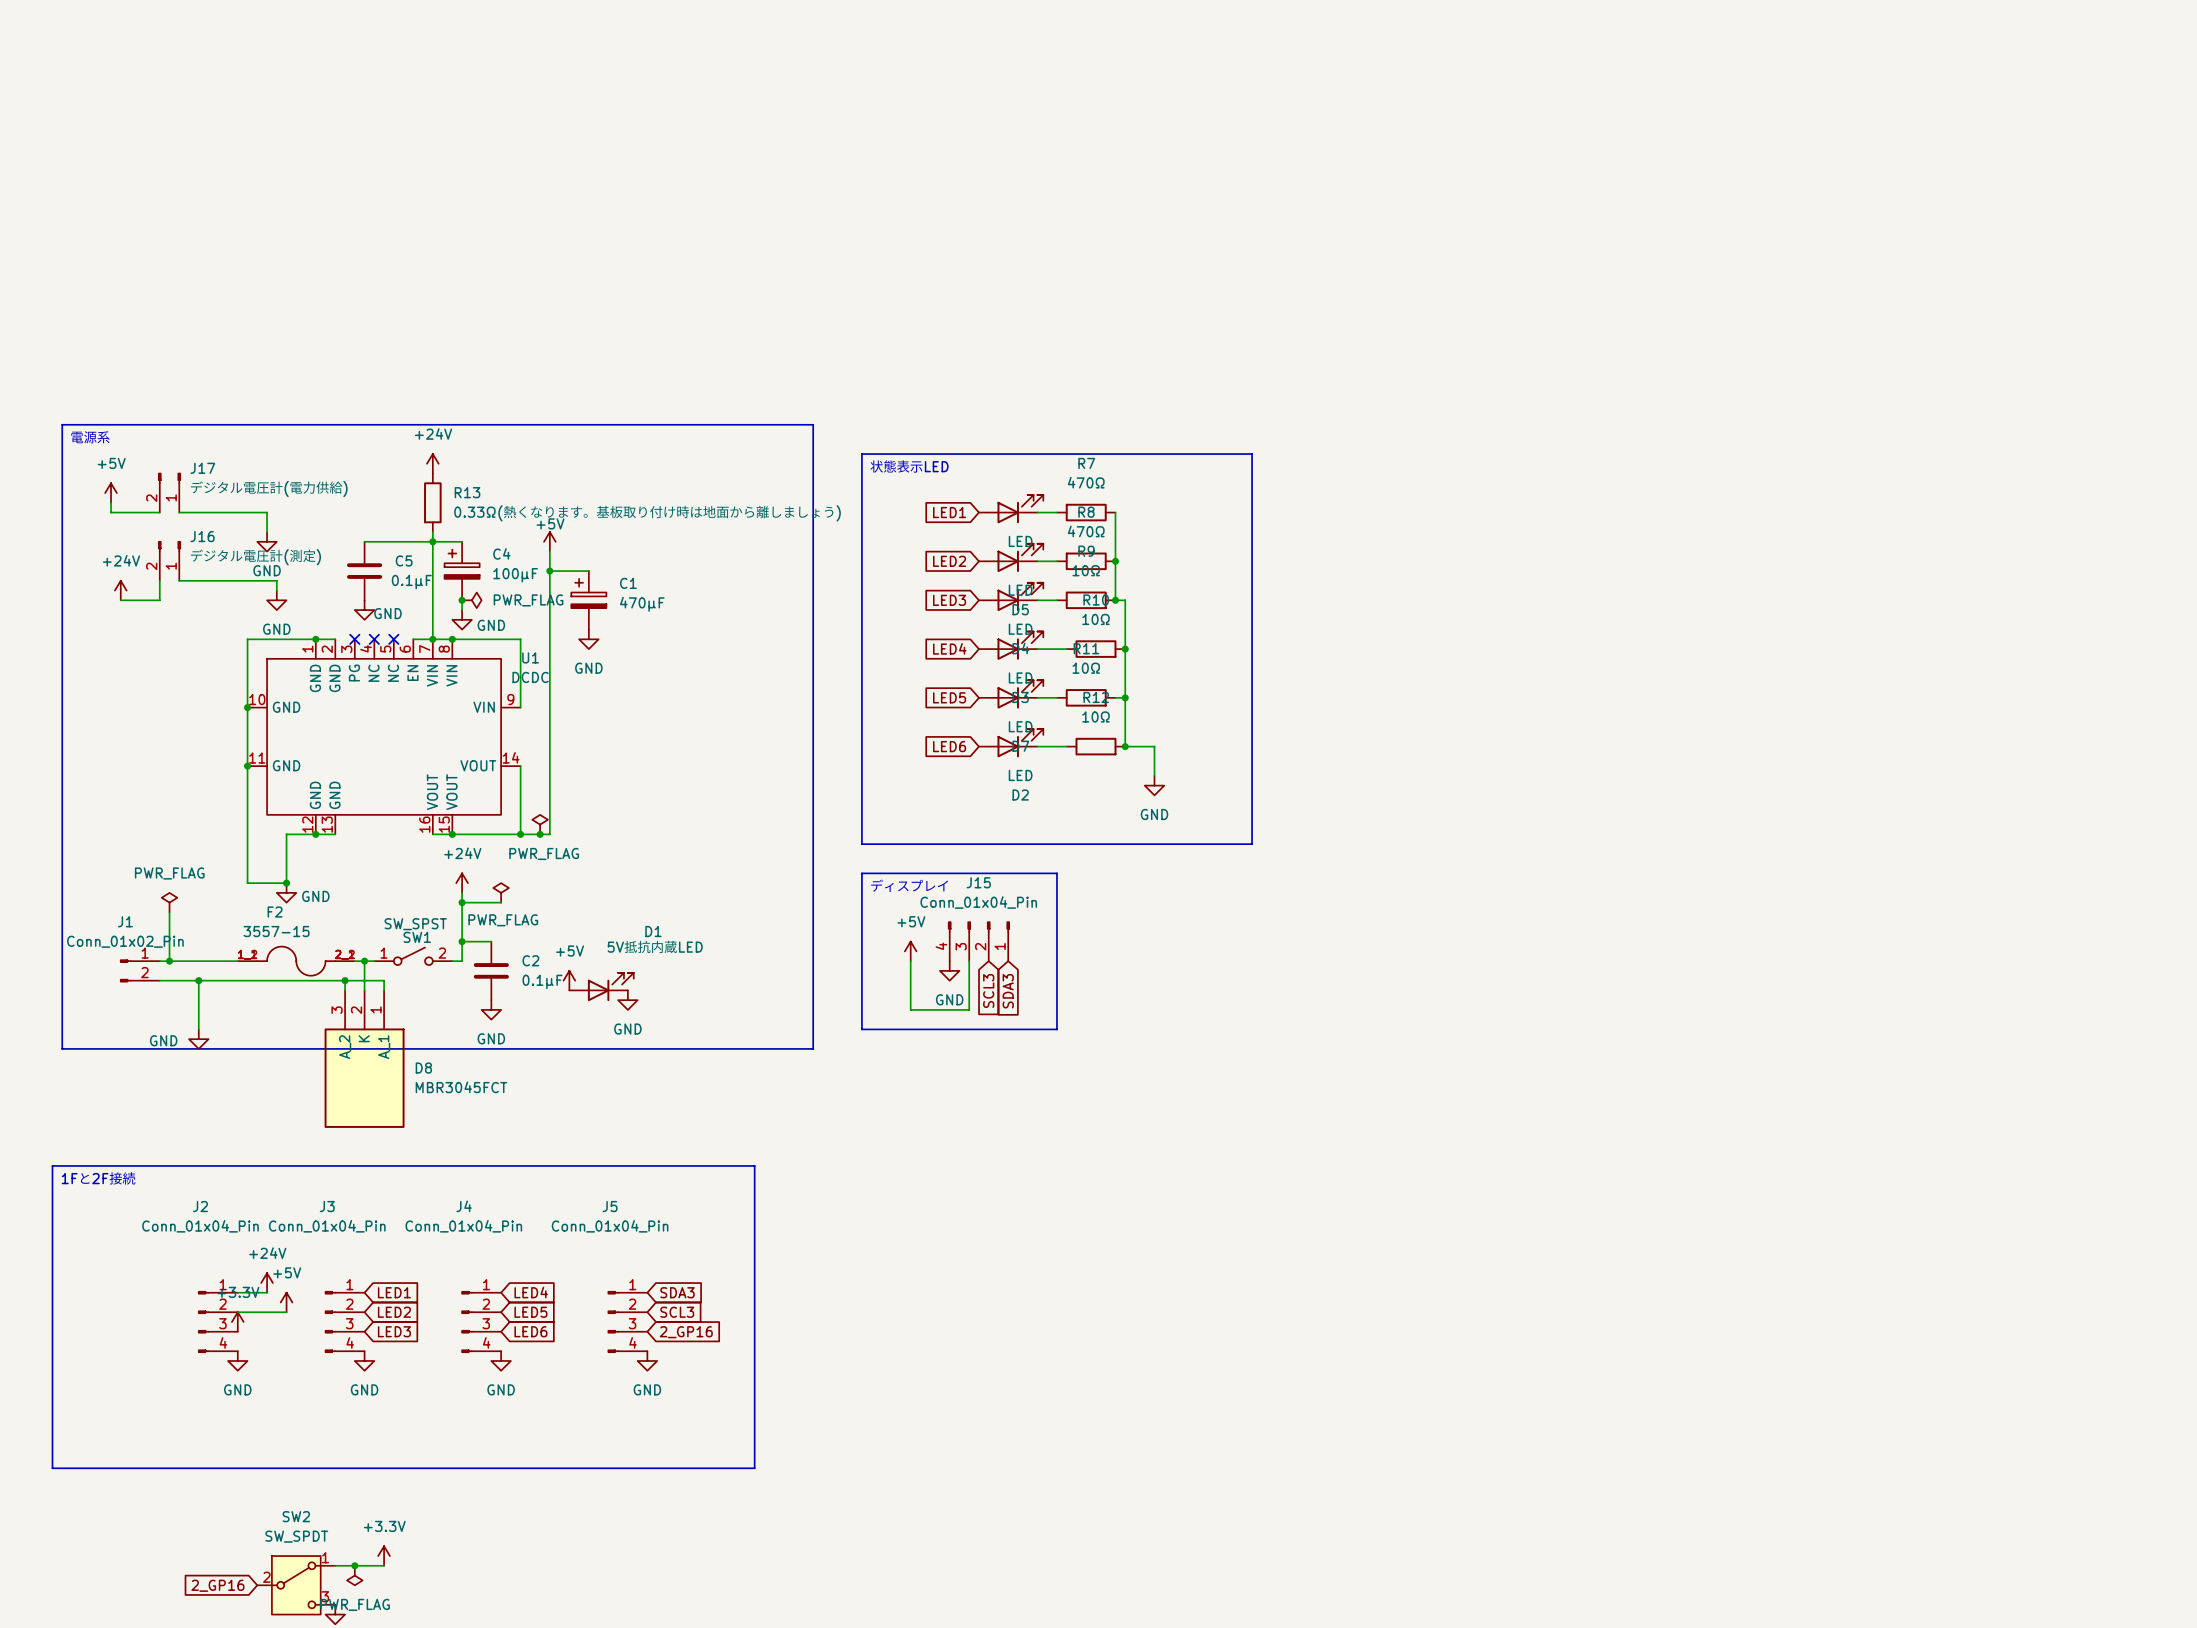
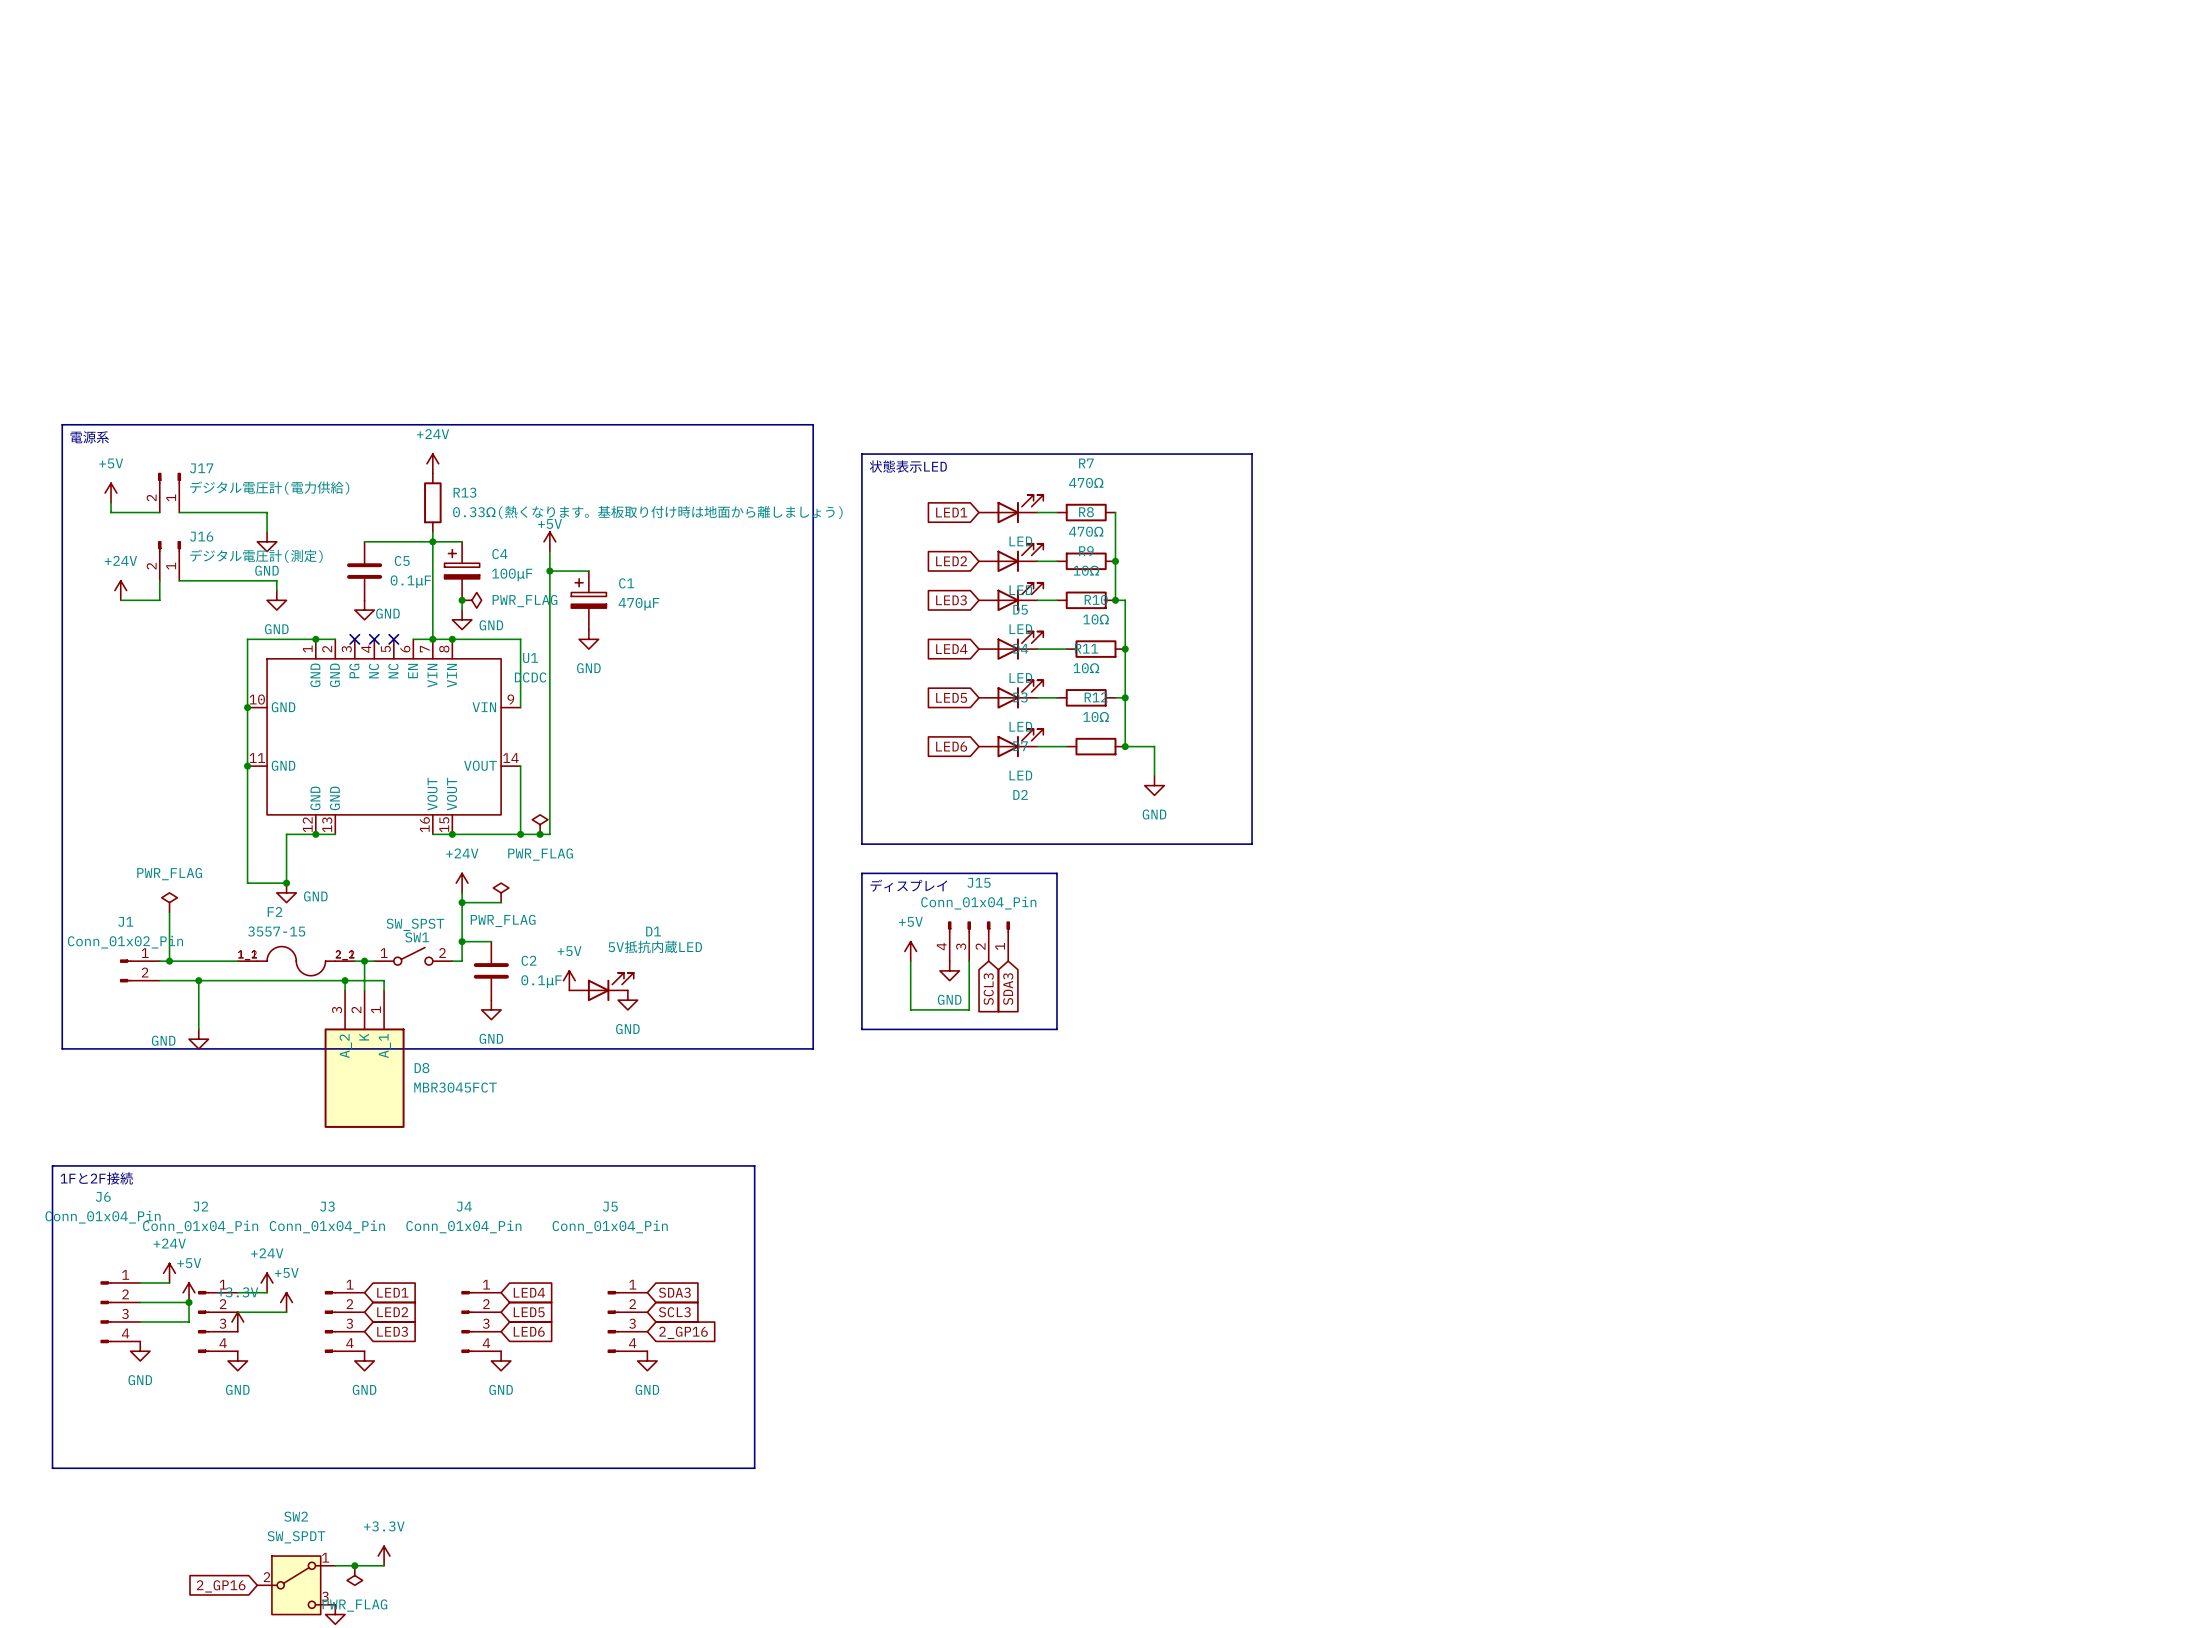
power symbol: none -> +24V (169, 1273)
wire: none -> (140, 1282) (169, 1282)
power symbol: none -> +5V (189, 1292)
wire: none -> (140, 1302) (189, 1302) (189, 1321) (140, 1321)
junction: none -> (189, 1302)
J6: none -> Conn_01x04_Pin (120, 1312)
power symbol: none -> GND (140, 1351)

